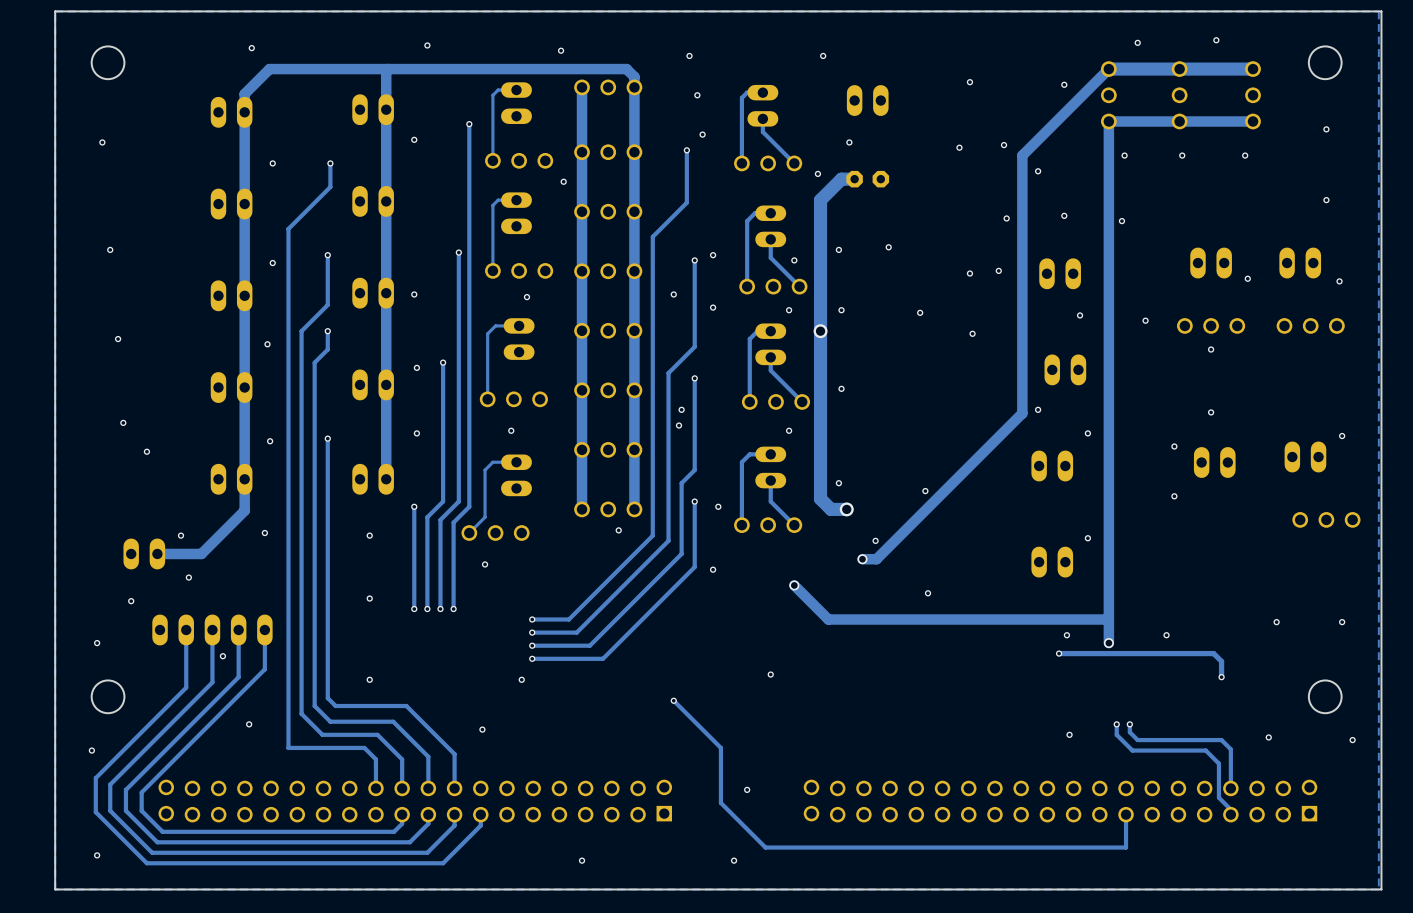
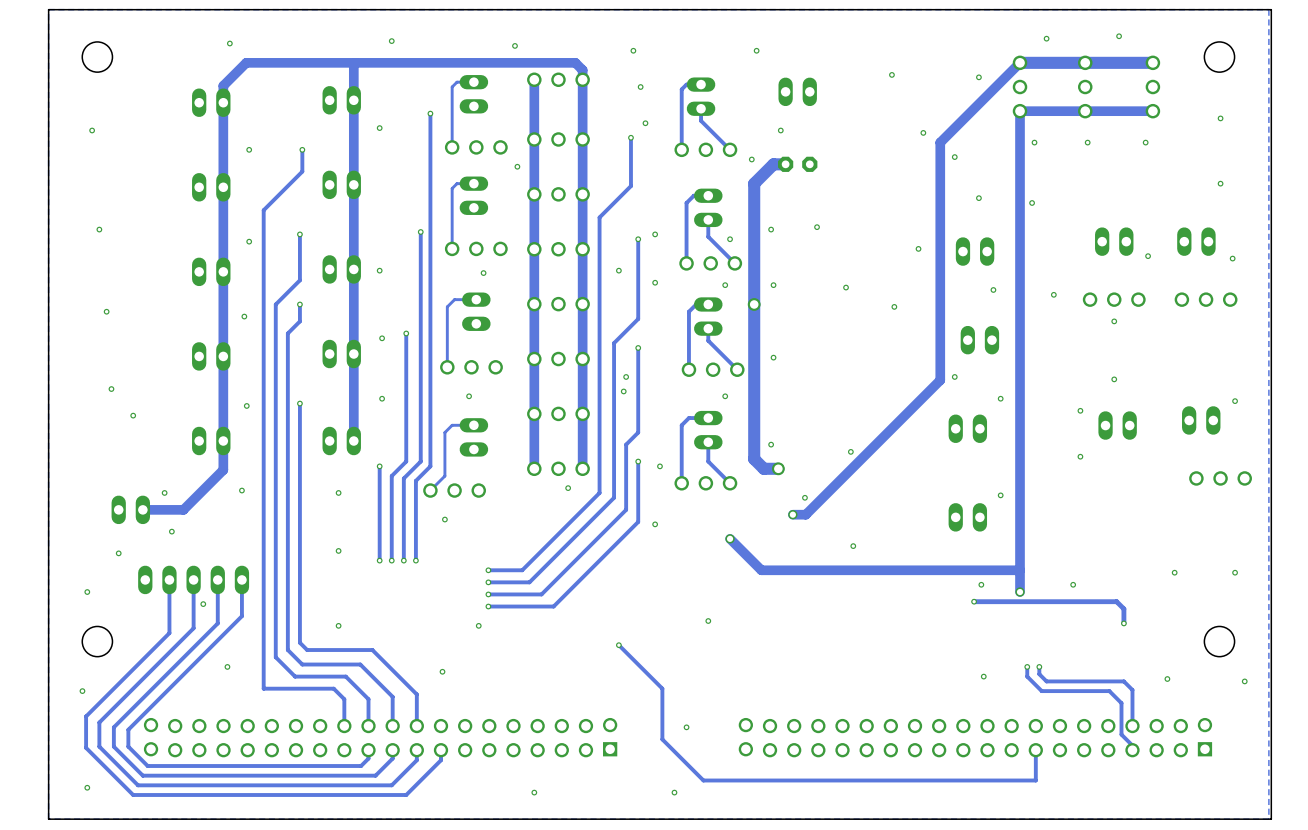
via: (959, 147) -> none
via: (1006, 218) -> none
via: (969, 273) -> none

